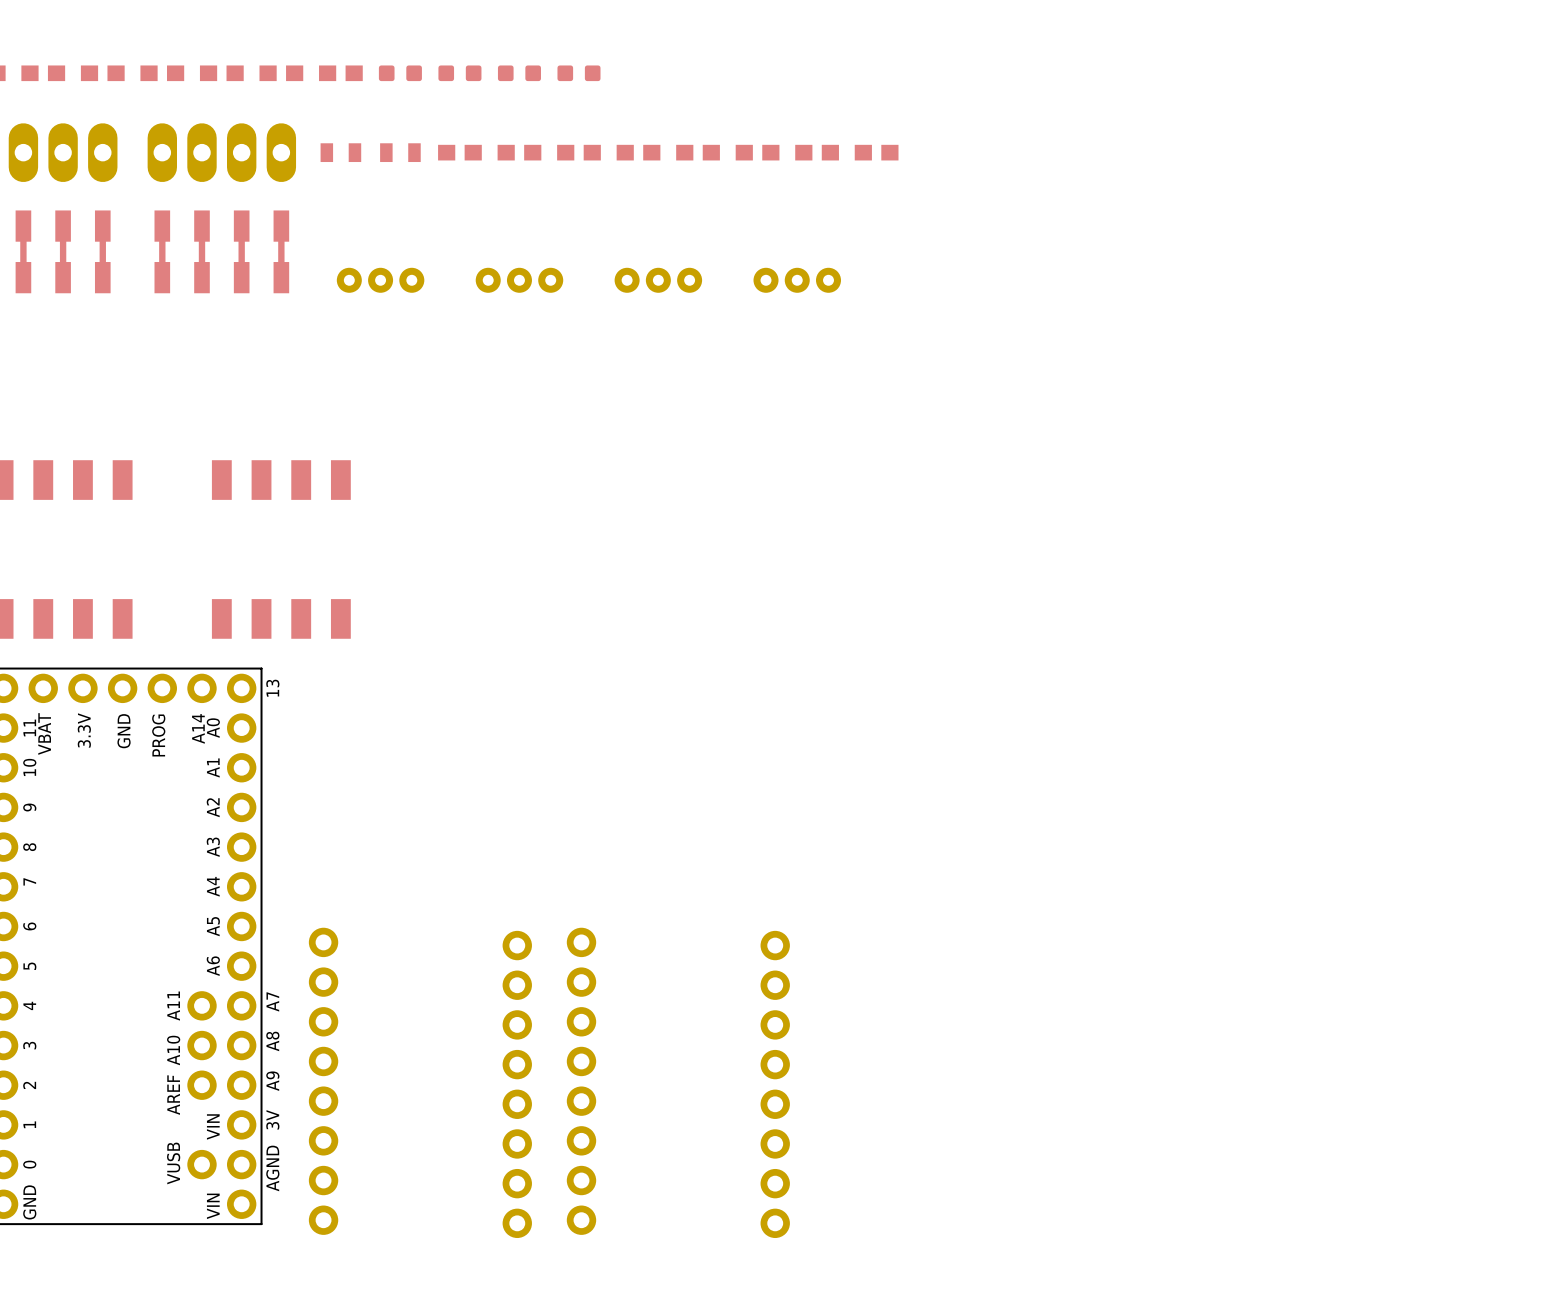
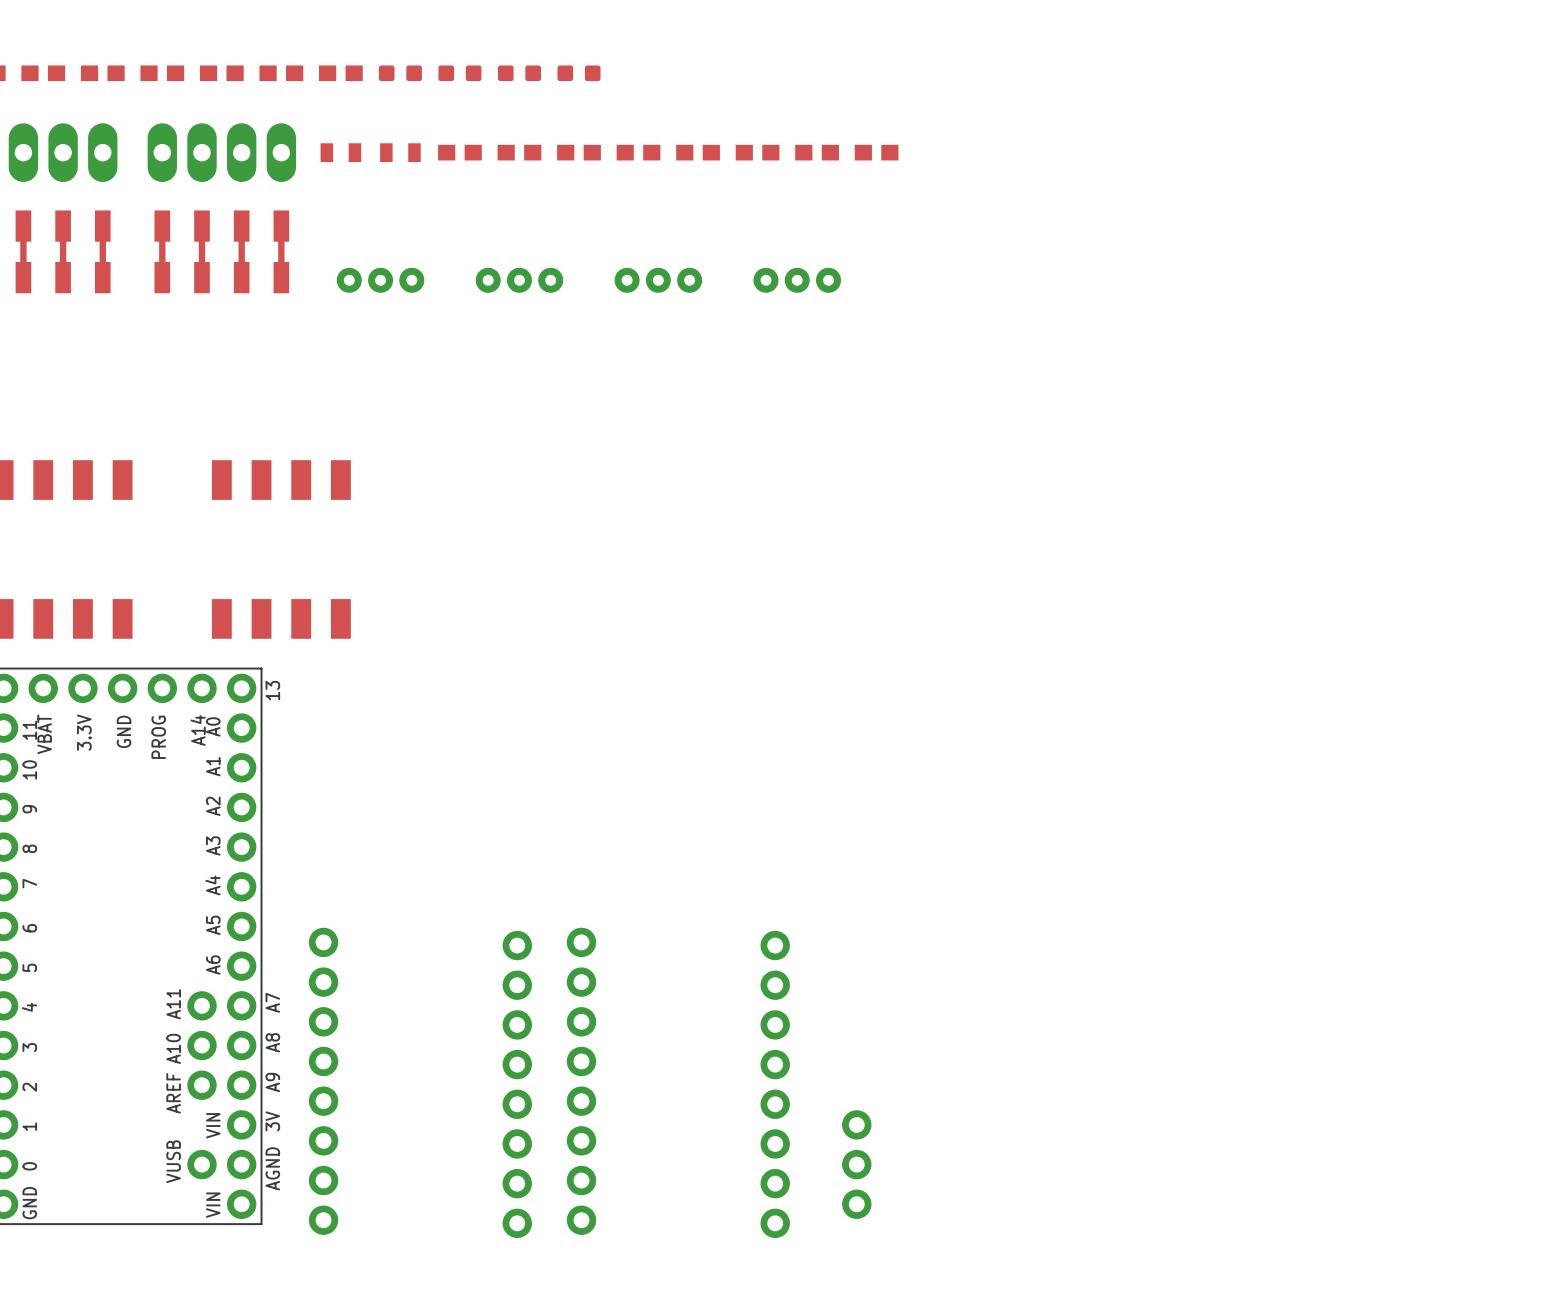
part: none -> (856, 1164)

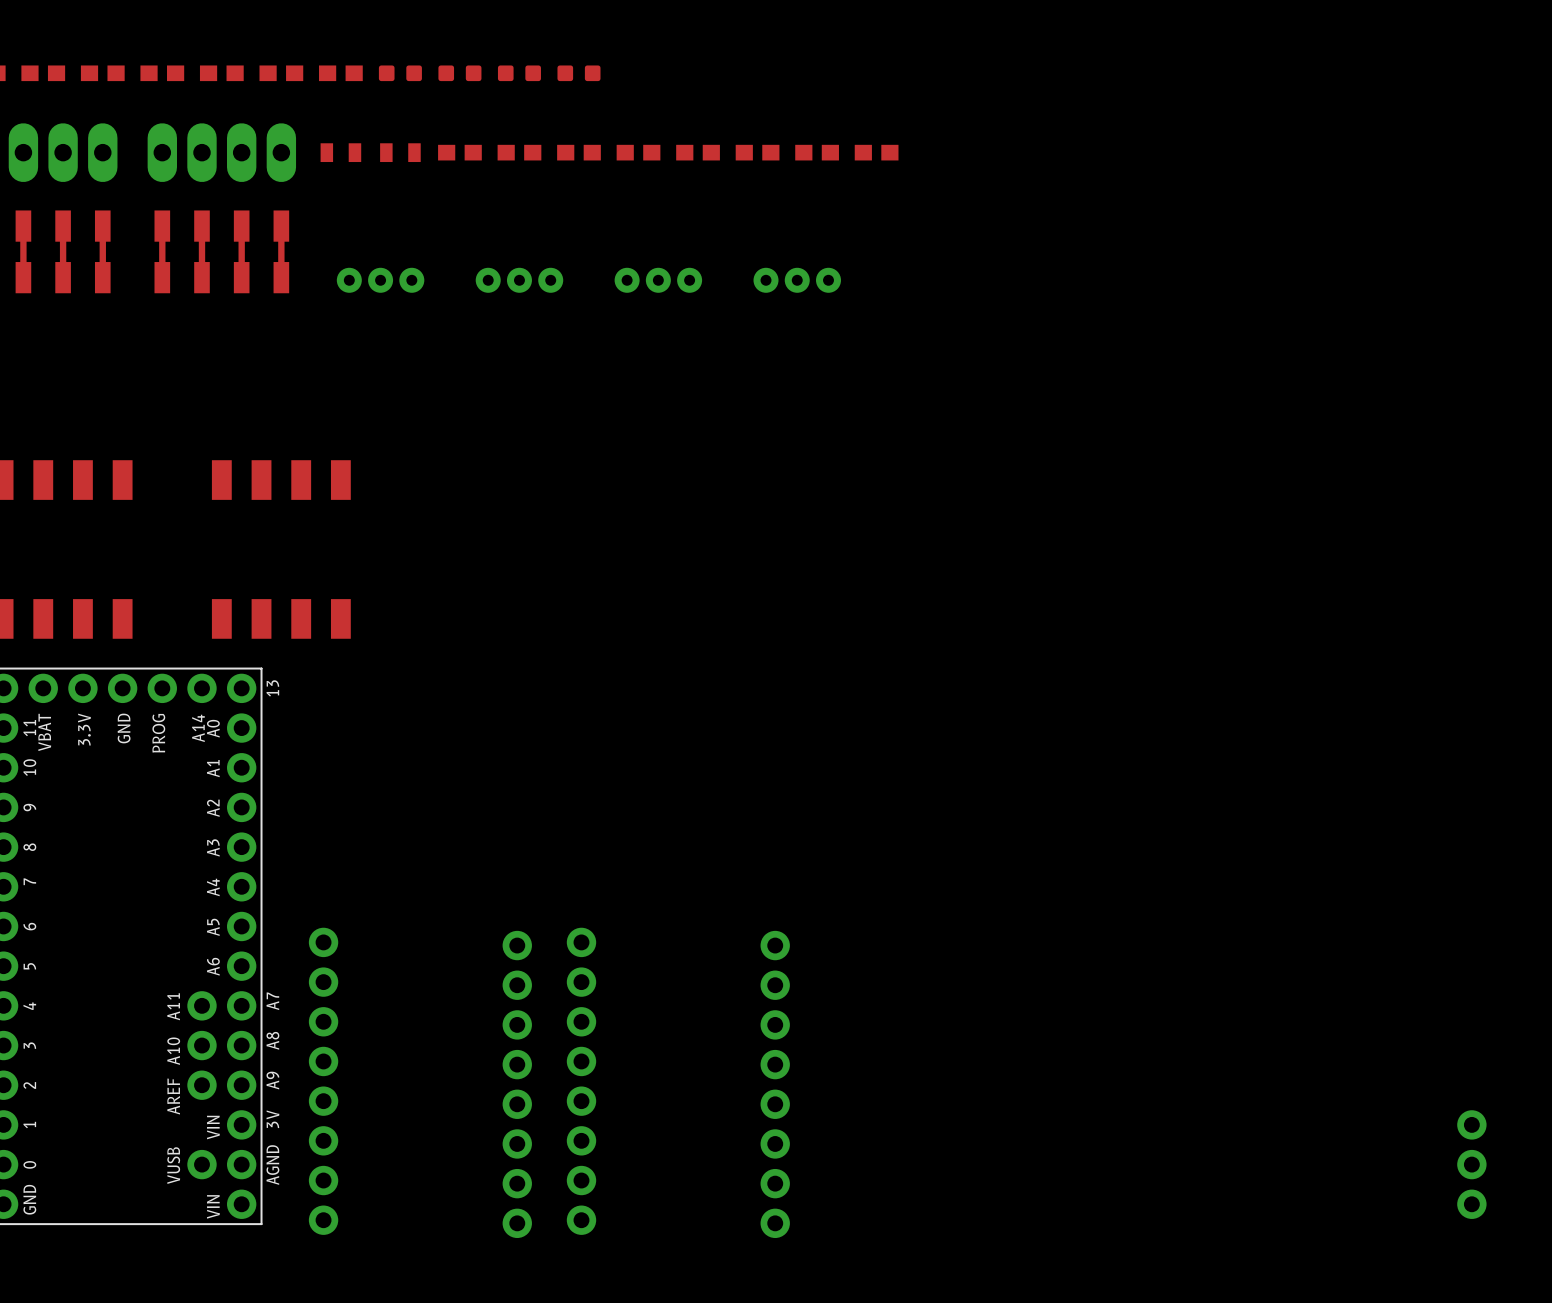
part: (856, 1164) -> none
part: none -> (1471, 1164)

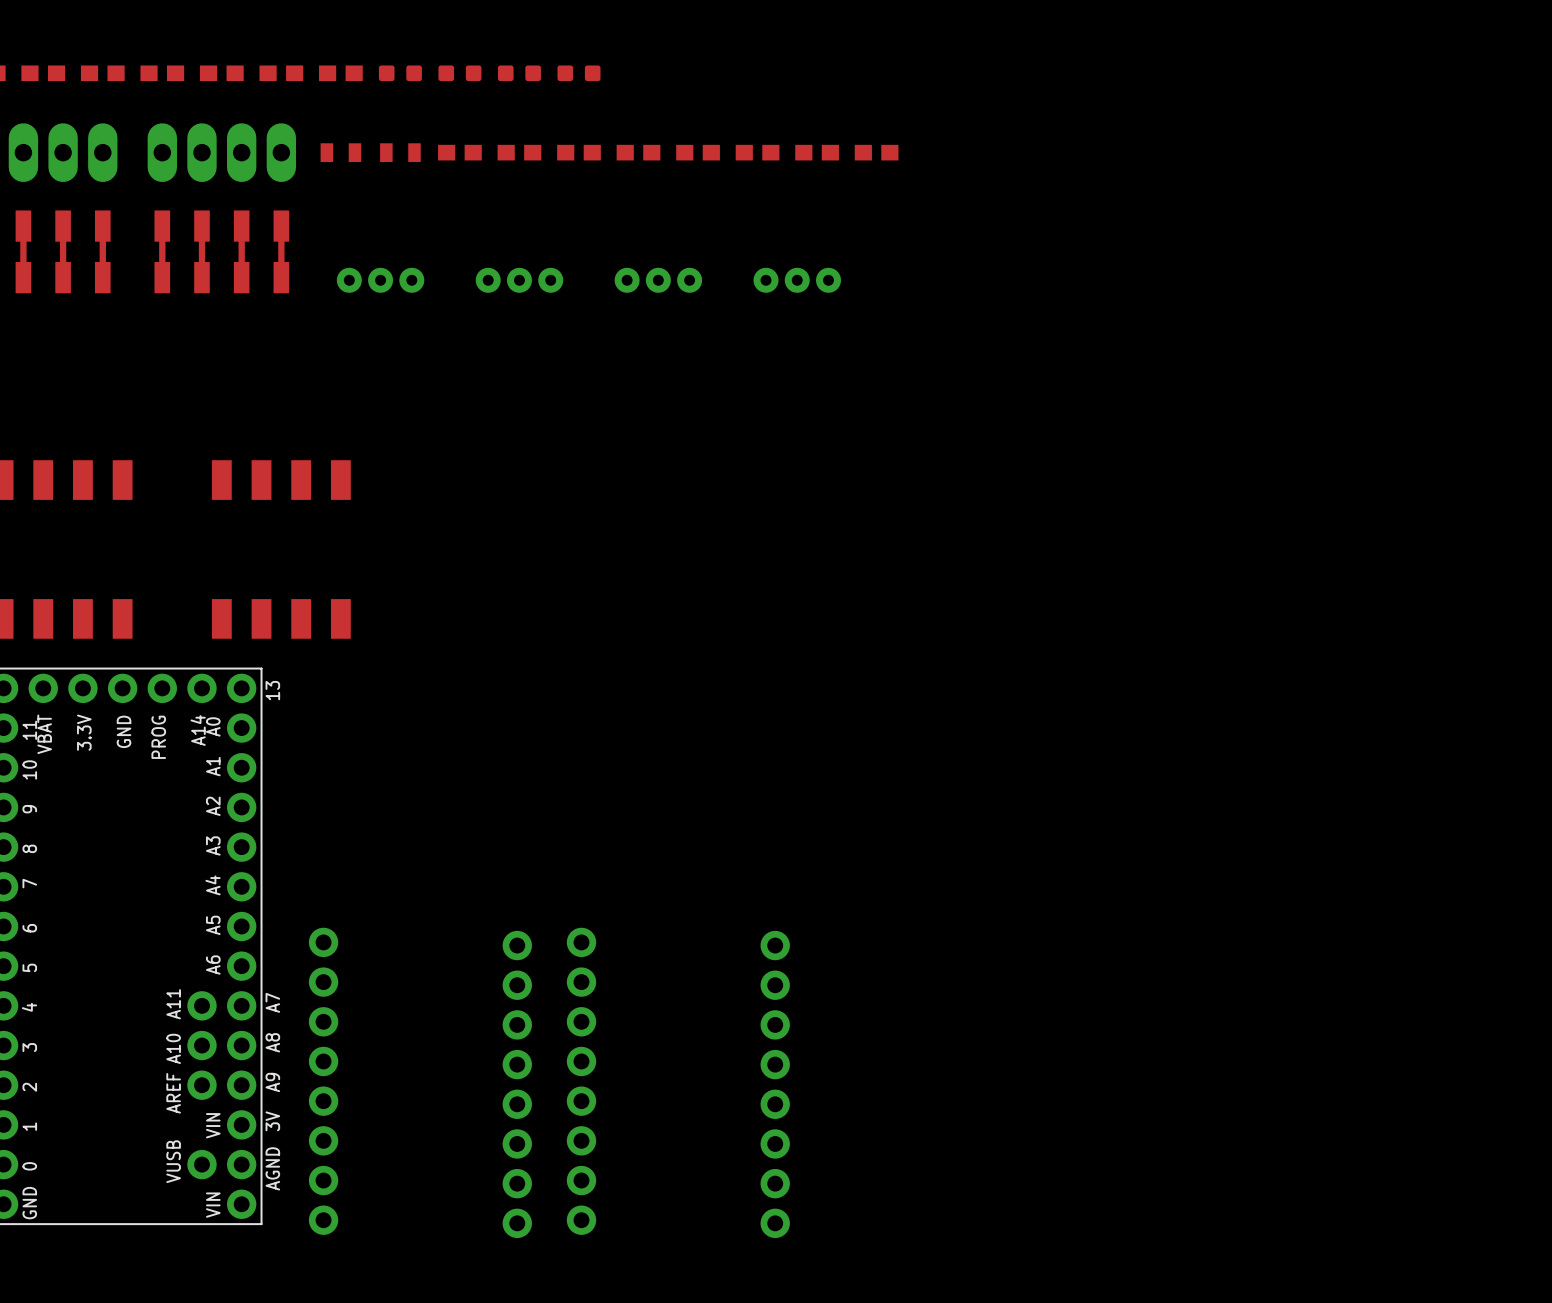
part: (1471, 1164) -> none

